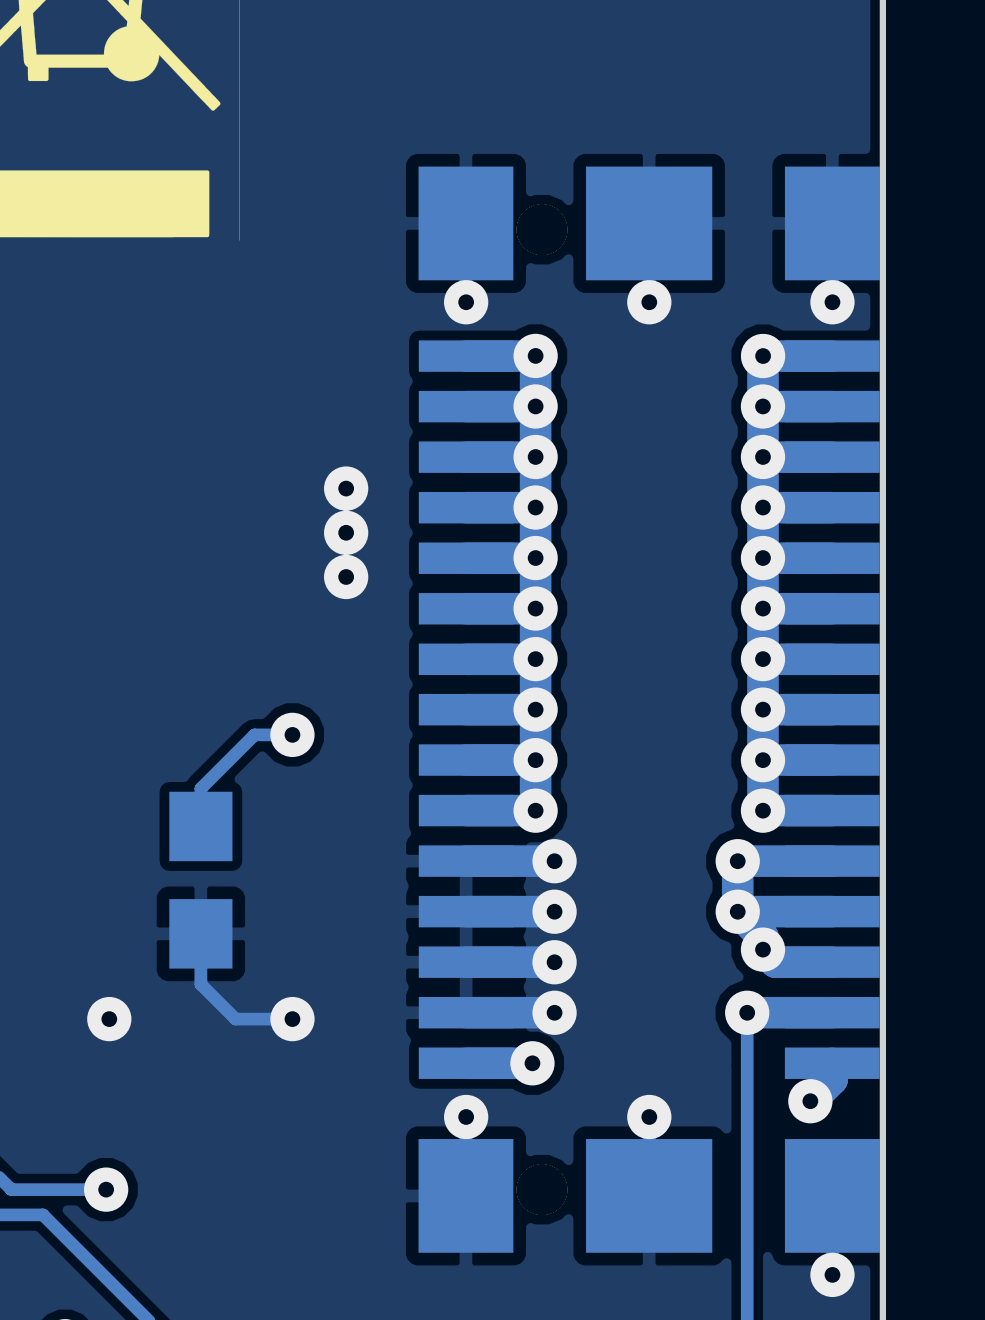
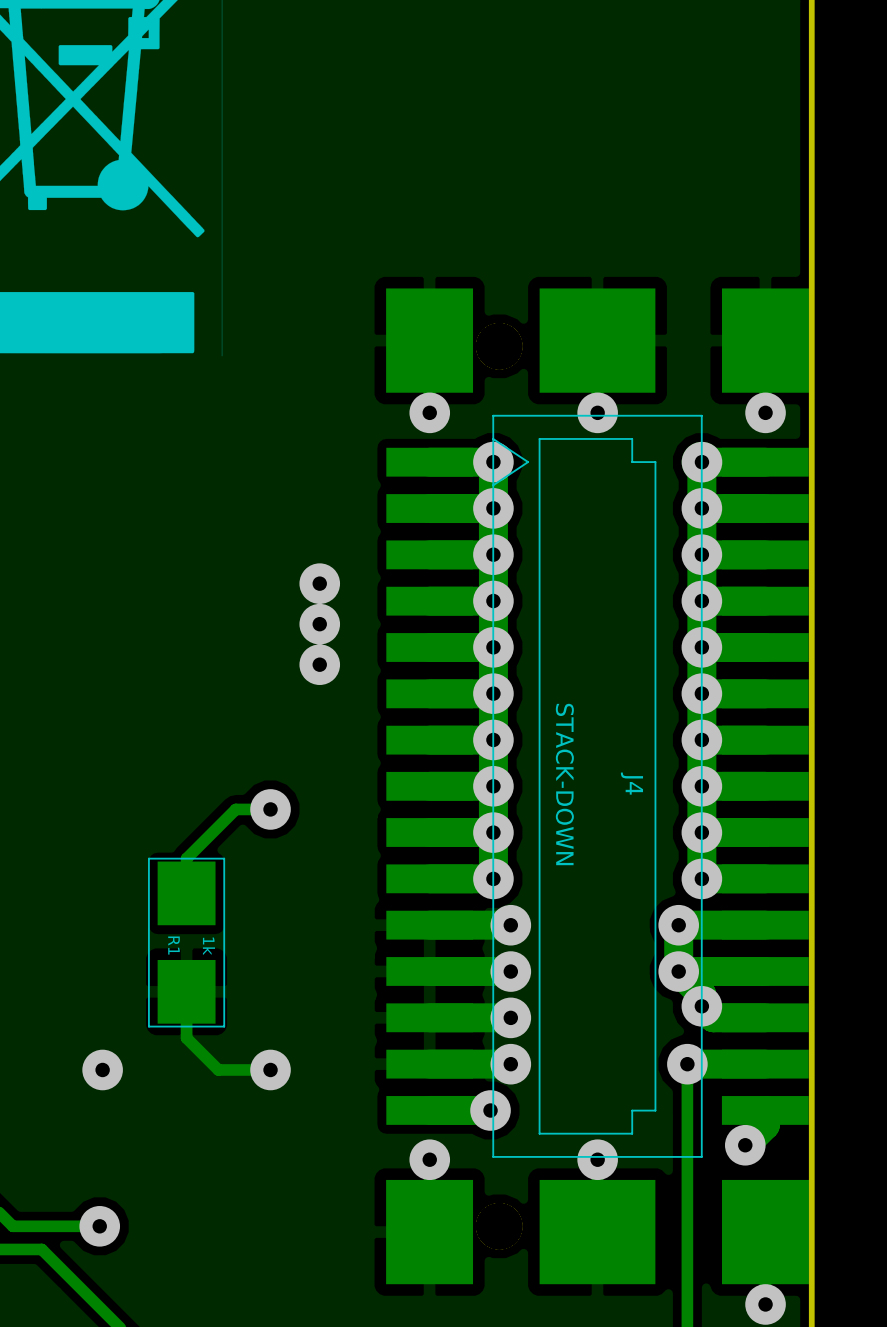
J4: none -> STACK-DOWN (597, 786)
part: (200, 880) -> none
R1: none -> 1k (186, 942)

